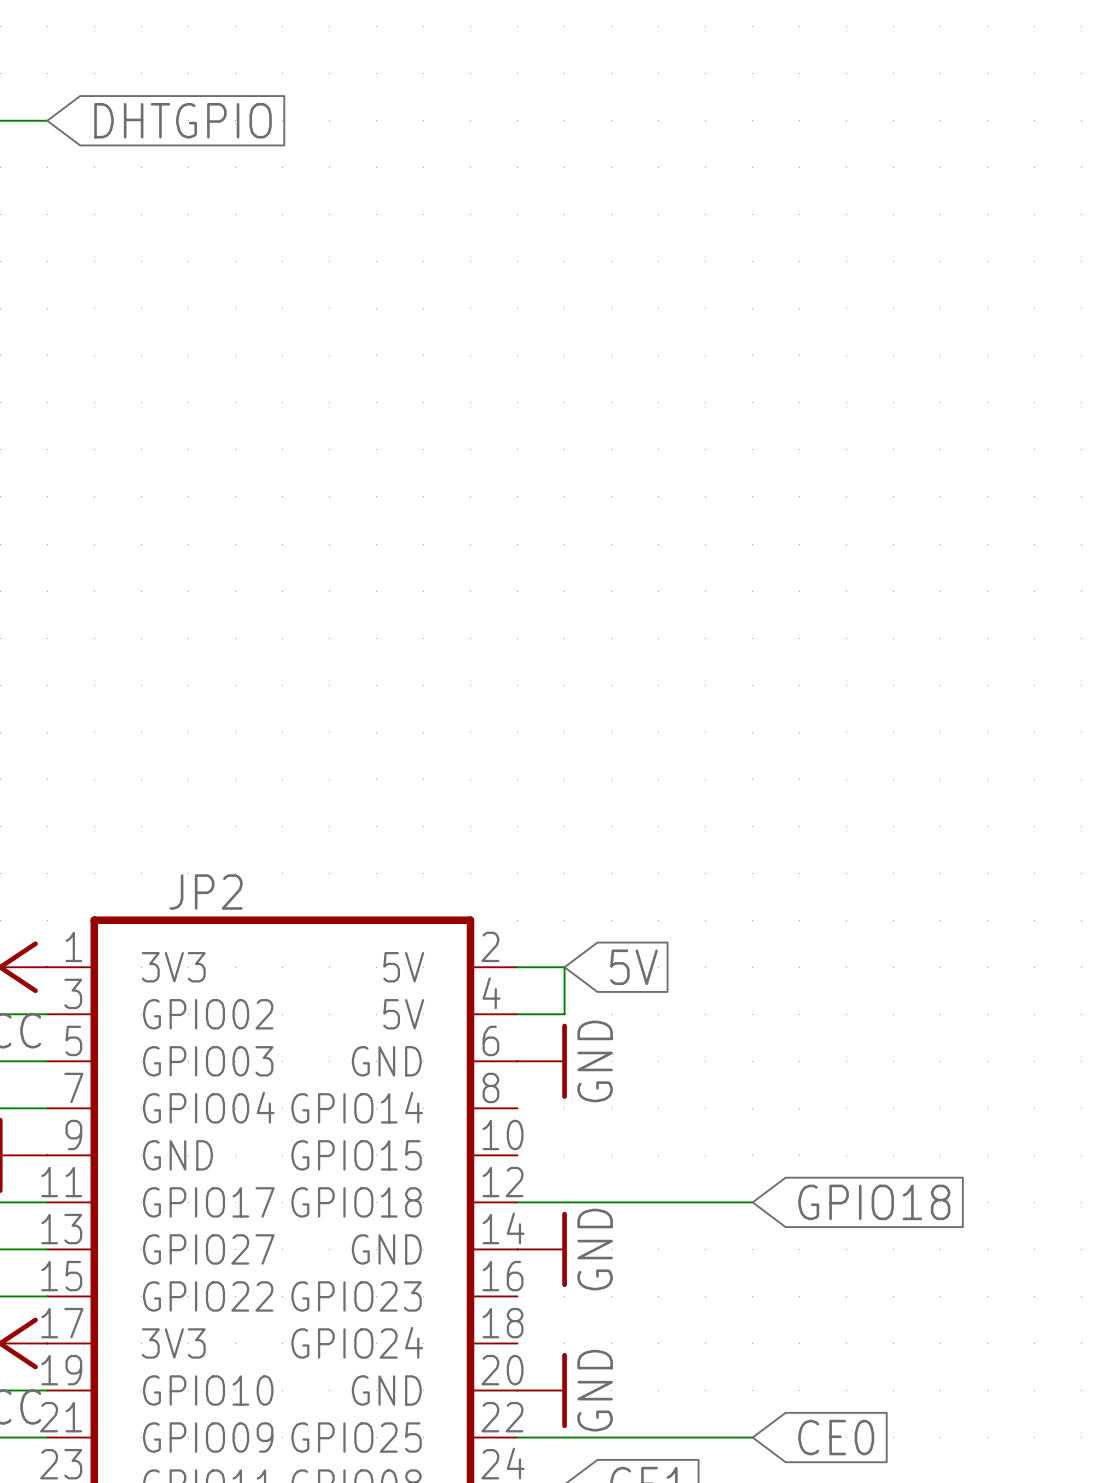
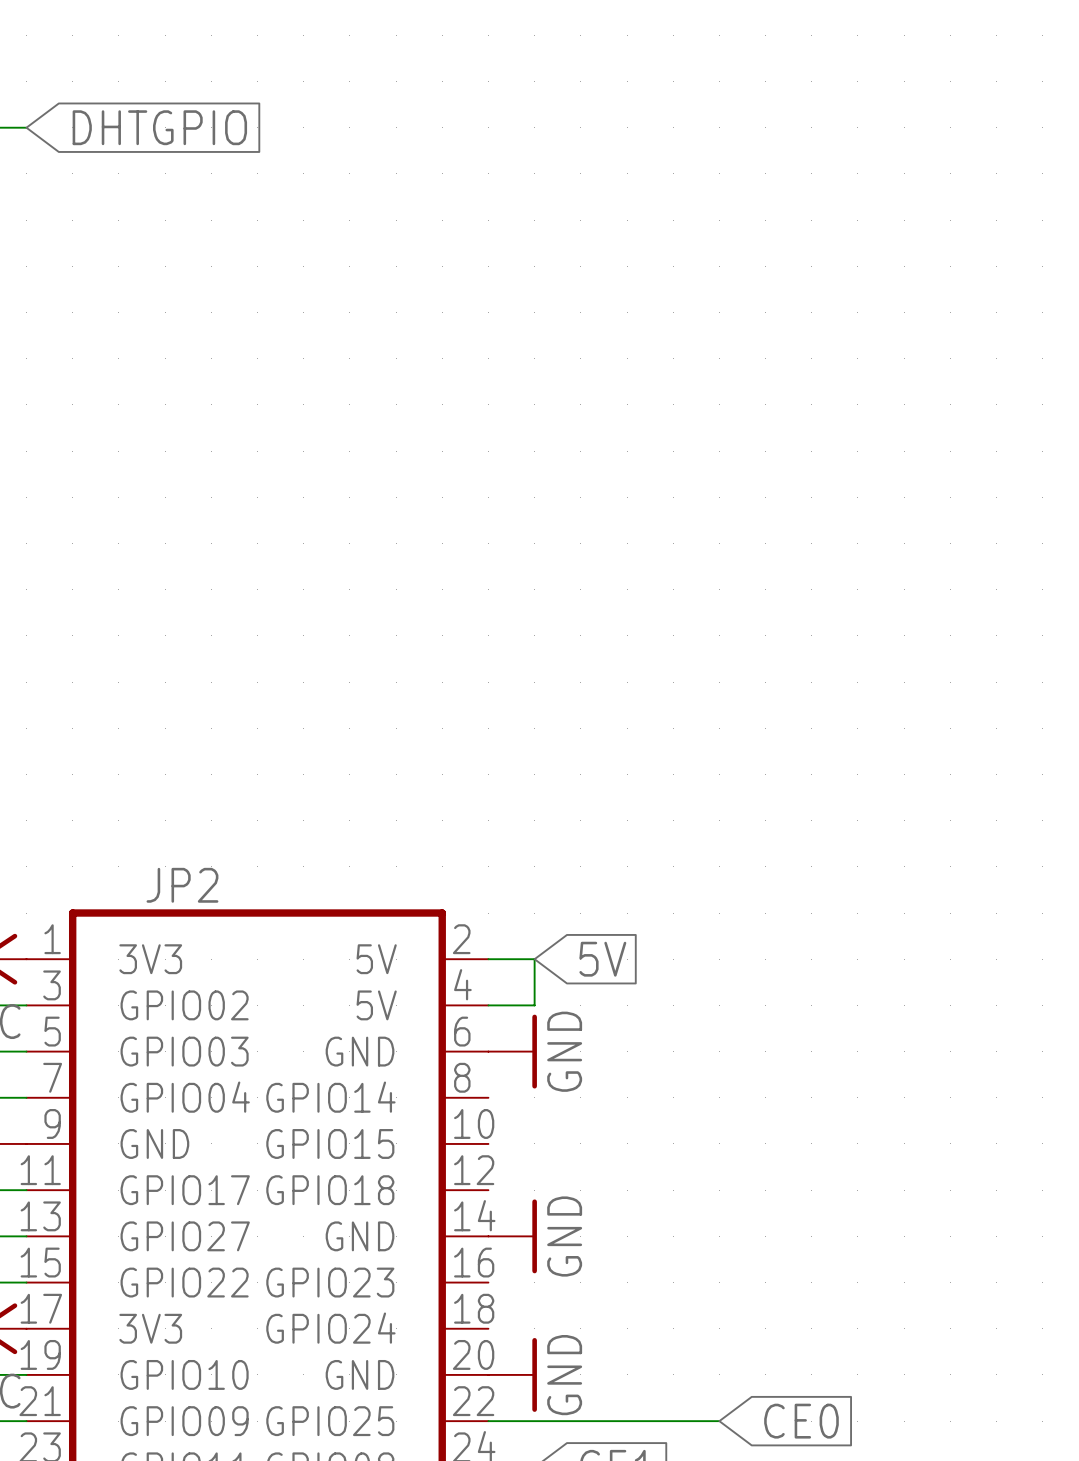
wire: (517, 1202) (752, 1202) -> none
global label: GPIO18 (874, 1202) -> none

